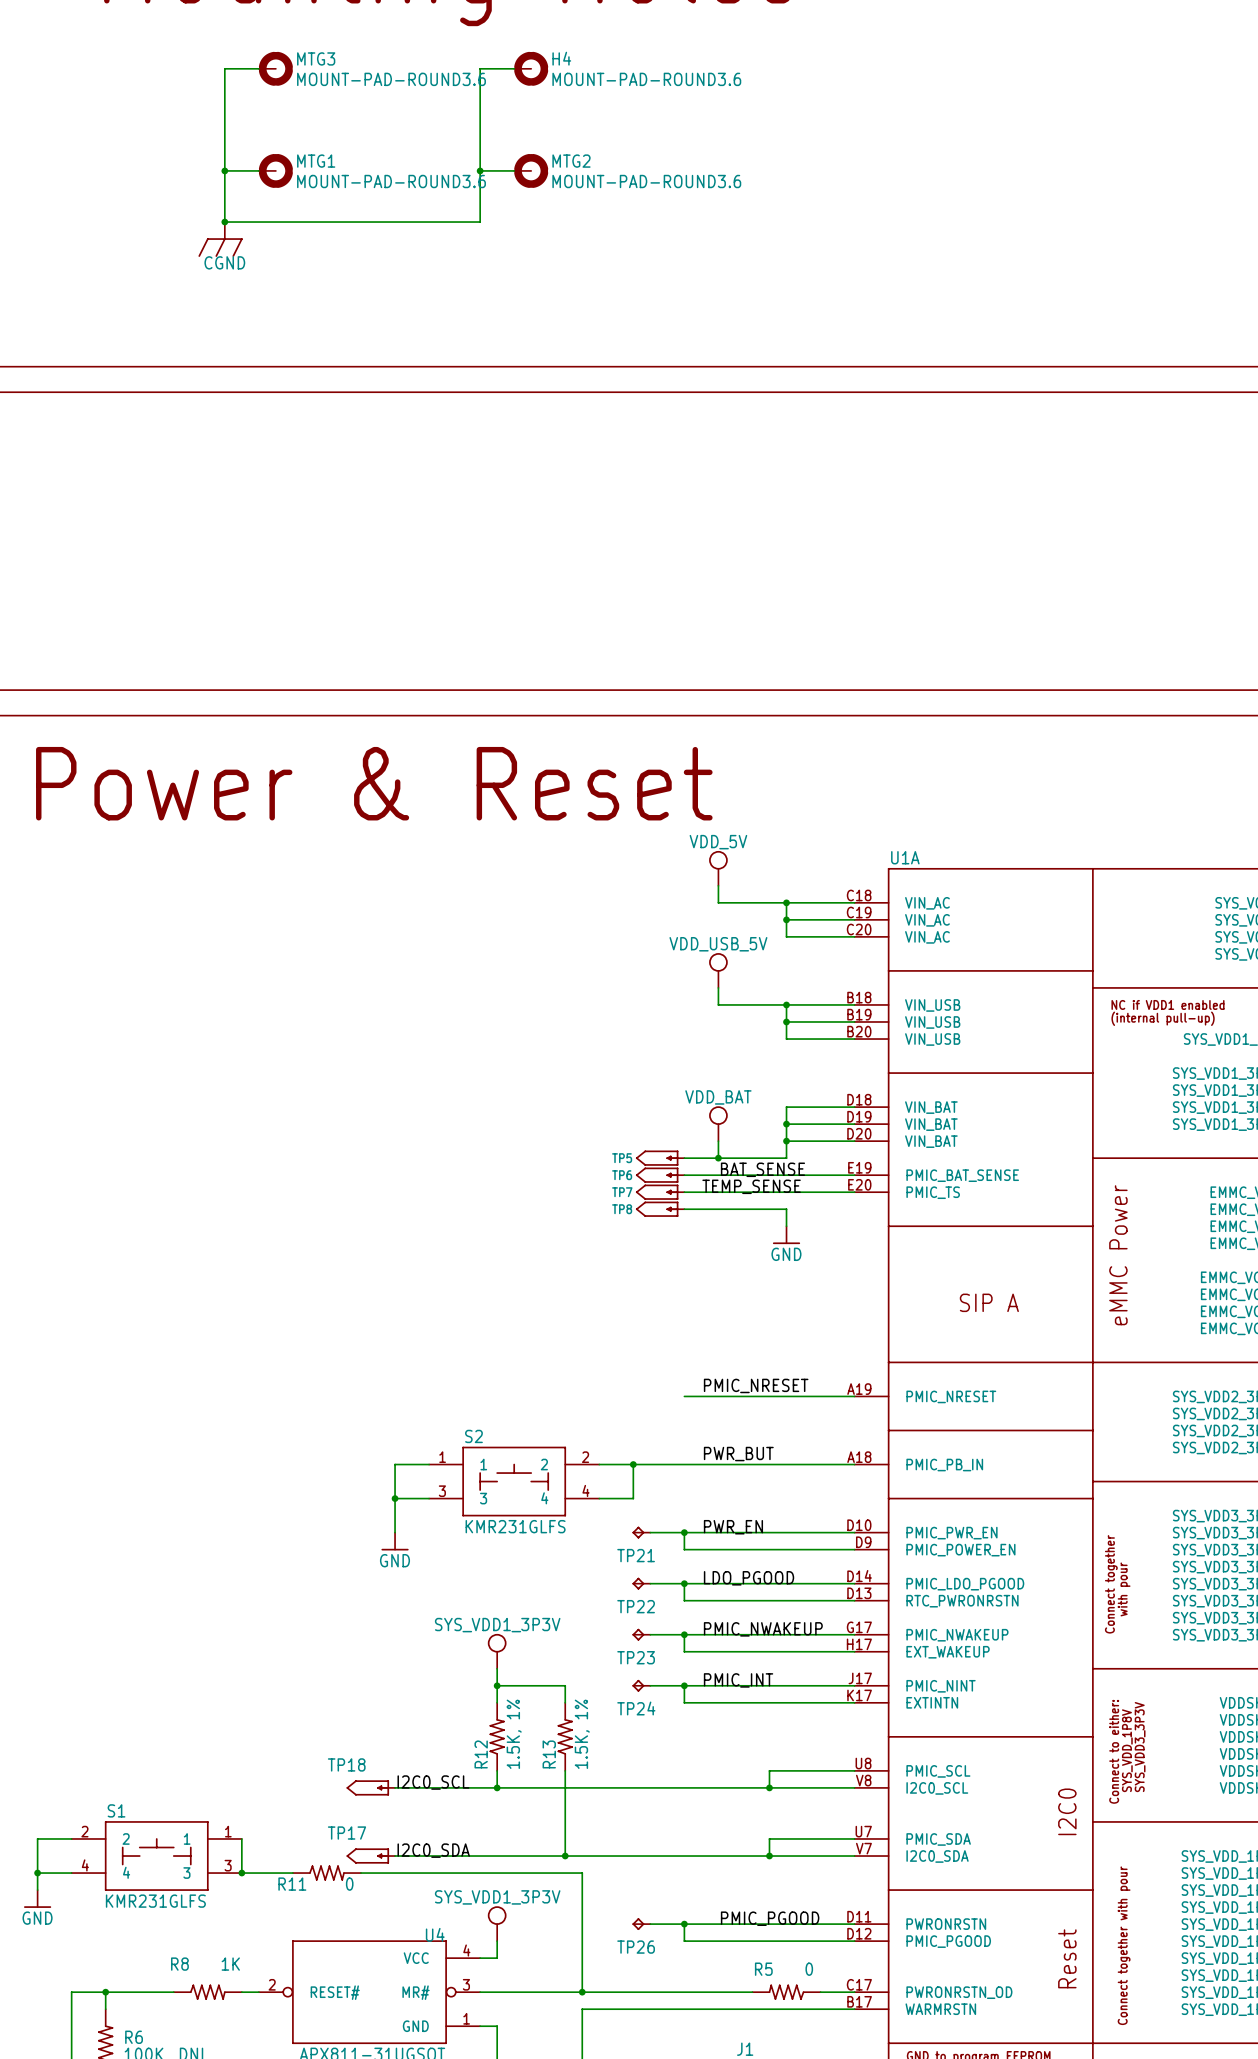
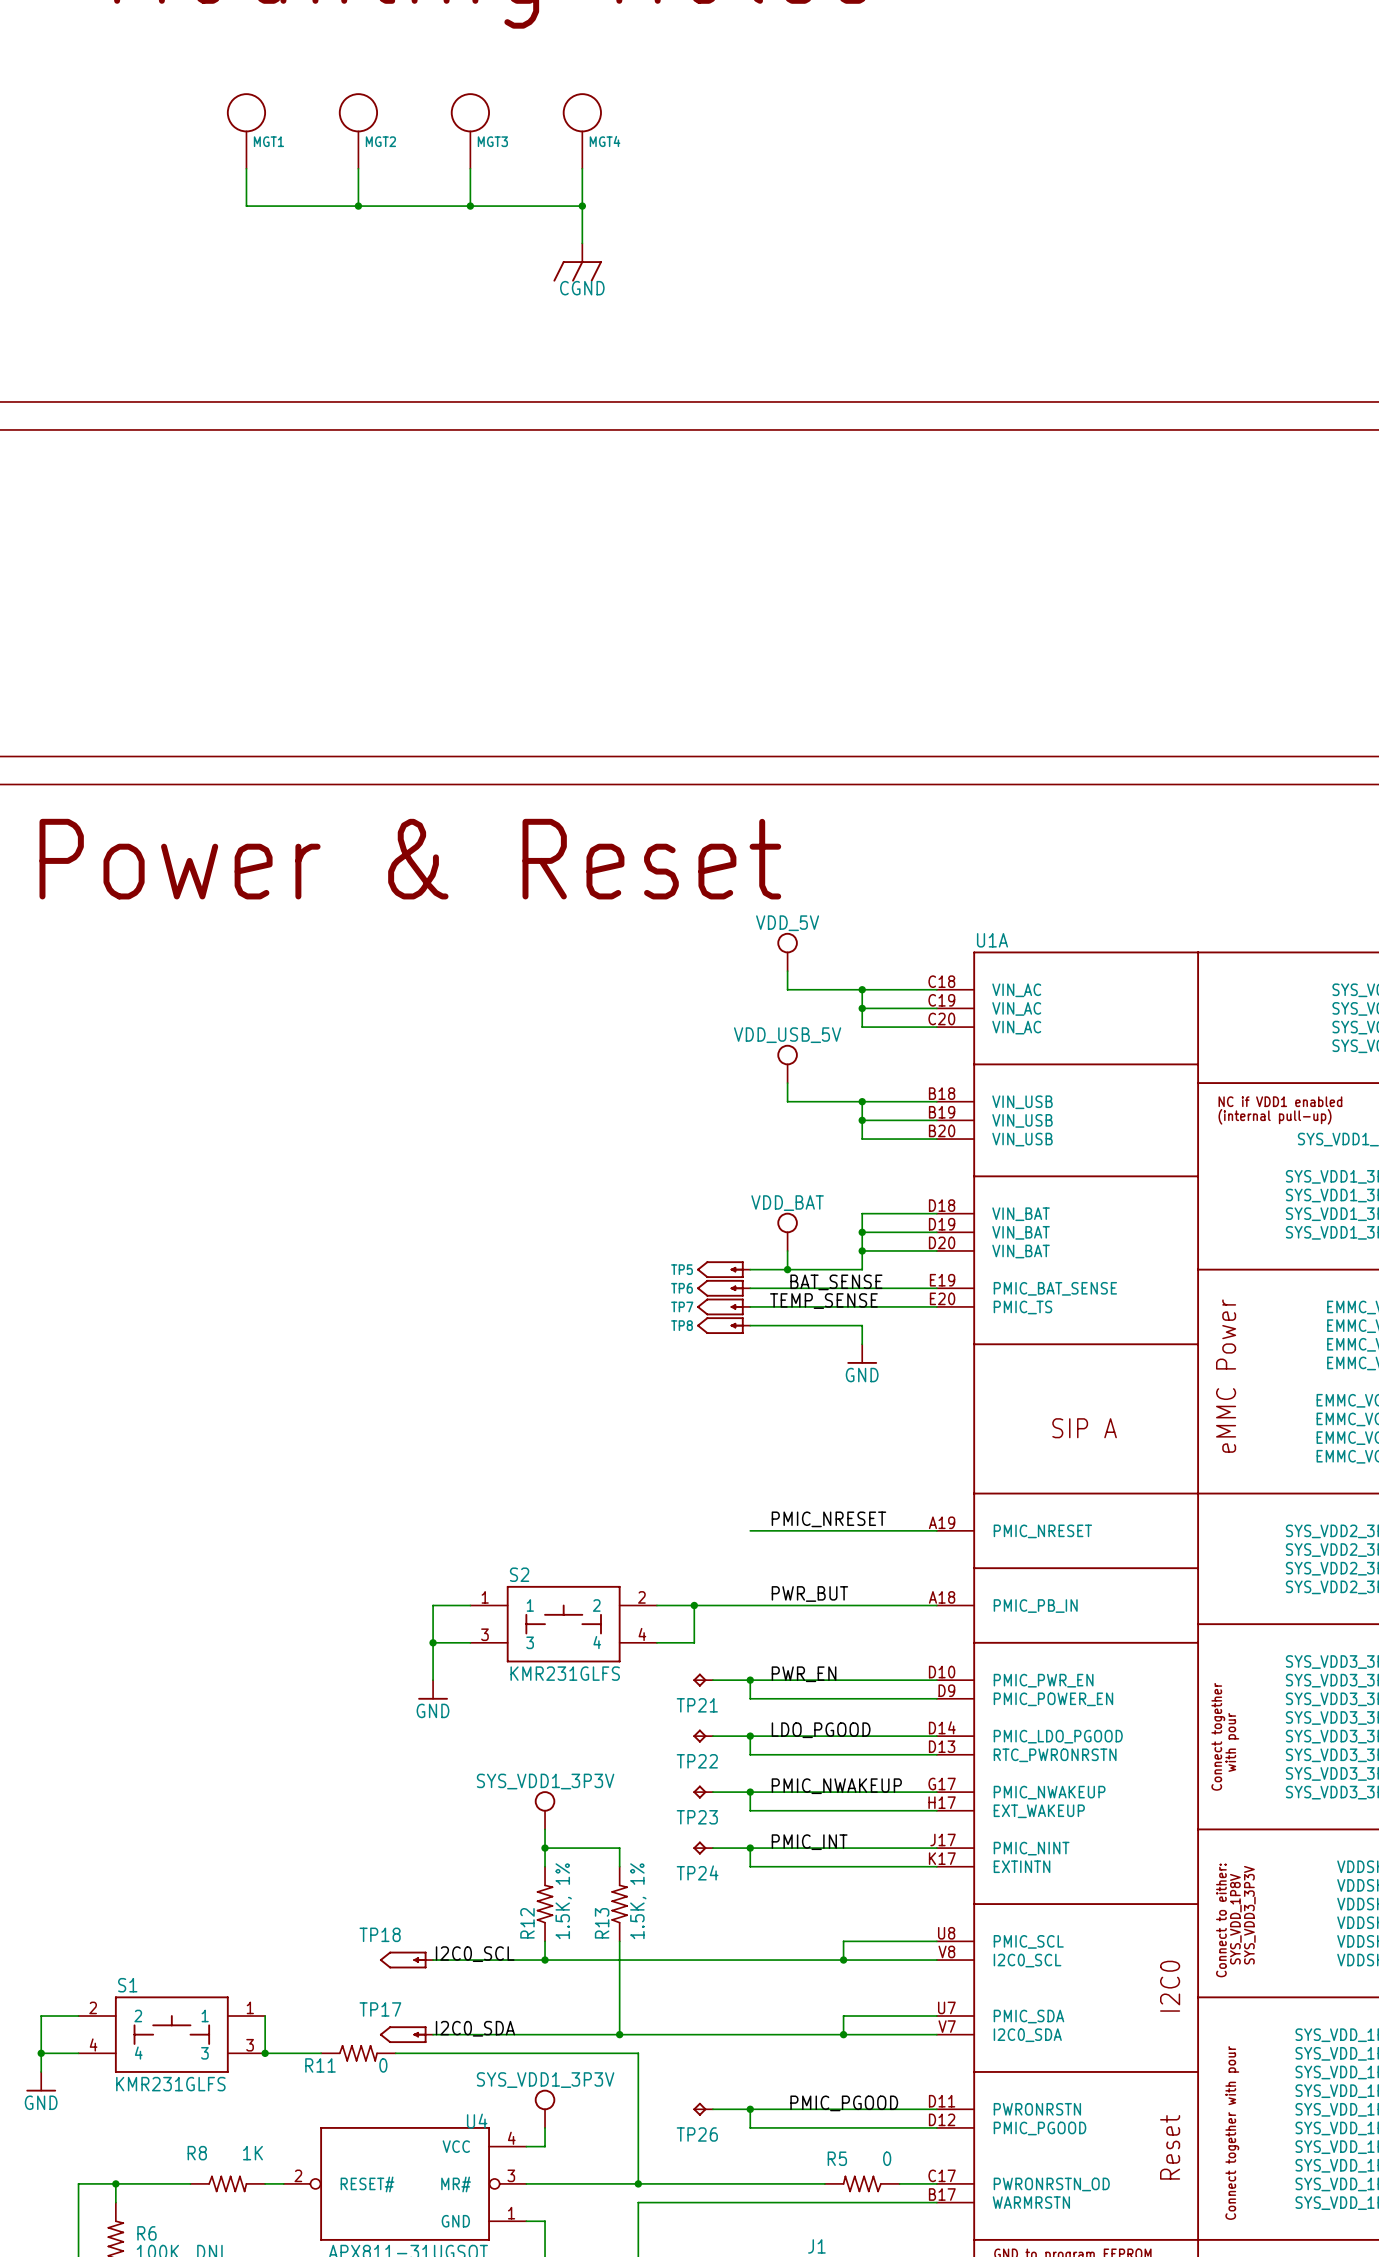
wire: (258, 68) (224, 68) (224, 153) -> none
MTG3: MOUNT-PAD-ROUND3.6 (275, 68) -> none
wire: (514, 68) (480, 68) (480, 222) (224, 222) (224, 187) -> (582, 206) (246, 206)
H4: MOUNT-PAD-ROUND3.6 (531, 68) -> none
MGT1: none -> (246, 130)
MGT2: none -> (358, 130)
MGT3: none -> (470, 130)
MGT4: none -> (582, 130)
wire: none -> (358, 168) (358, 206)
wire: none -> (470, 168) (470, 206)
wire: none -> (582, 168) (582, 243)
wire: (224, 170) (258, 170) -> none
junction: (224, 170) -> none
MTG1: MOUNT-PAD-ROUND3.6 (275, 170) -> none
wire: (480, 170) (514, 170) -> none
junction: (480, 170) -> none
MTG2: MOUNT-PAD-ROUND3.6 (531, 170) -> none
junction: none -> (358, 206)
junction: none -> (470, 206)
junction: none -> (582, 206)
junction: (224, 222) -> none
power symbol: CGND (220, 239) -> none
power symbol: none -> CGND (577, 262)

